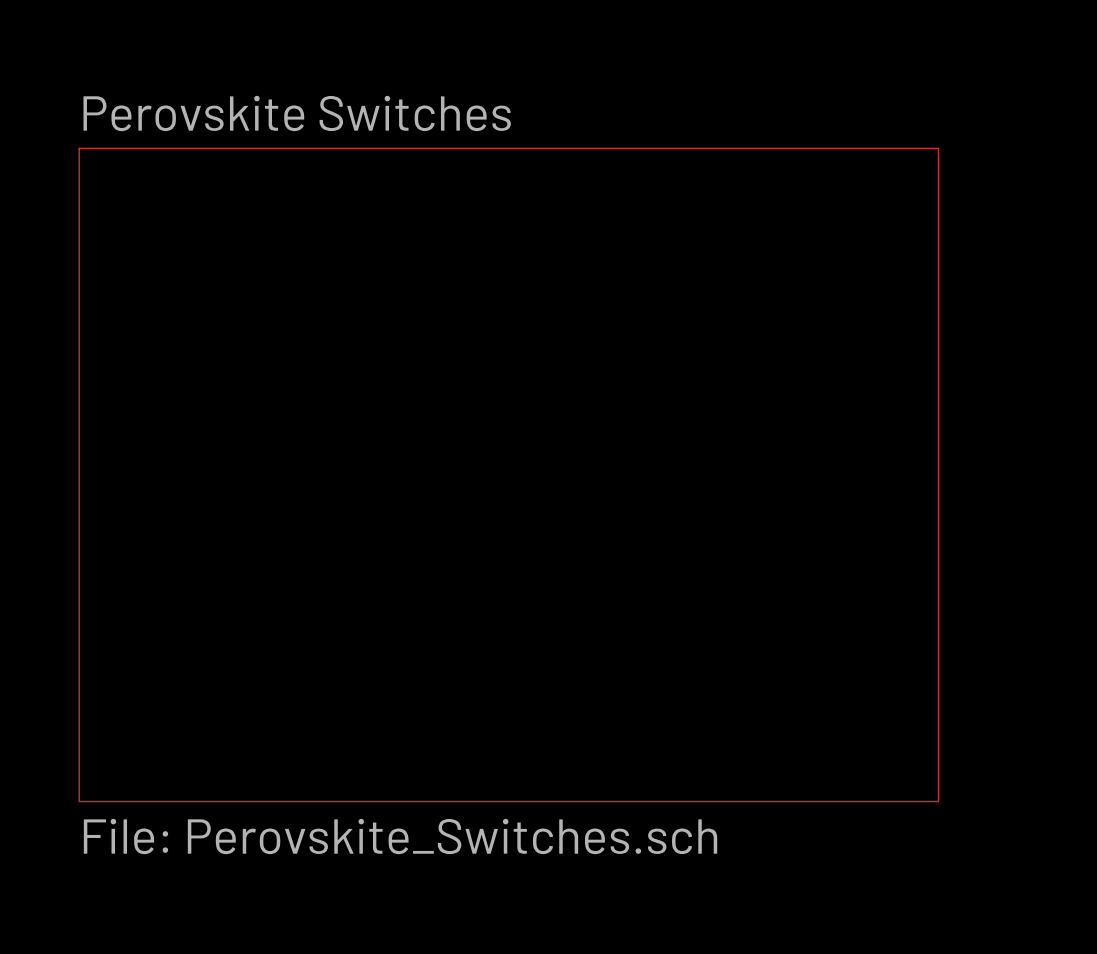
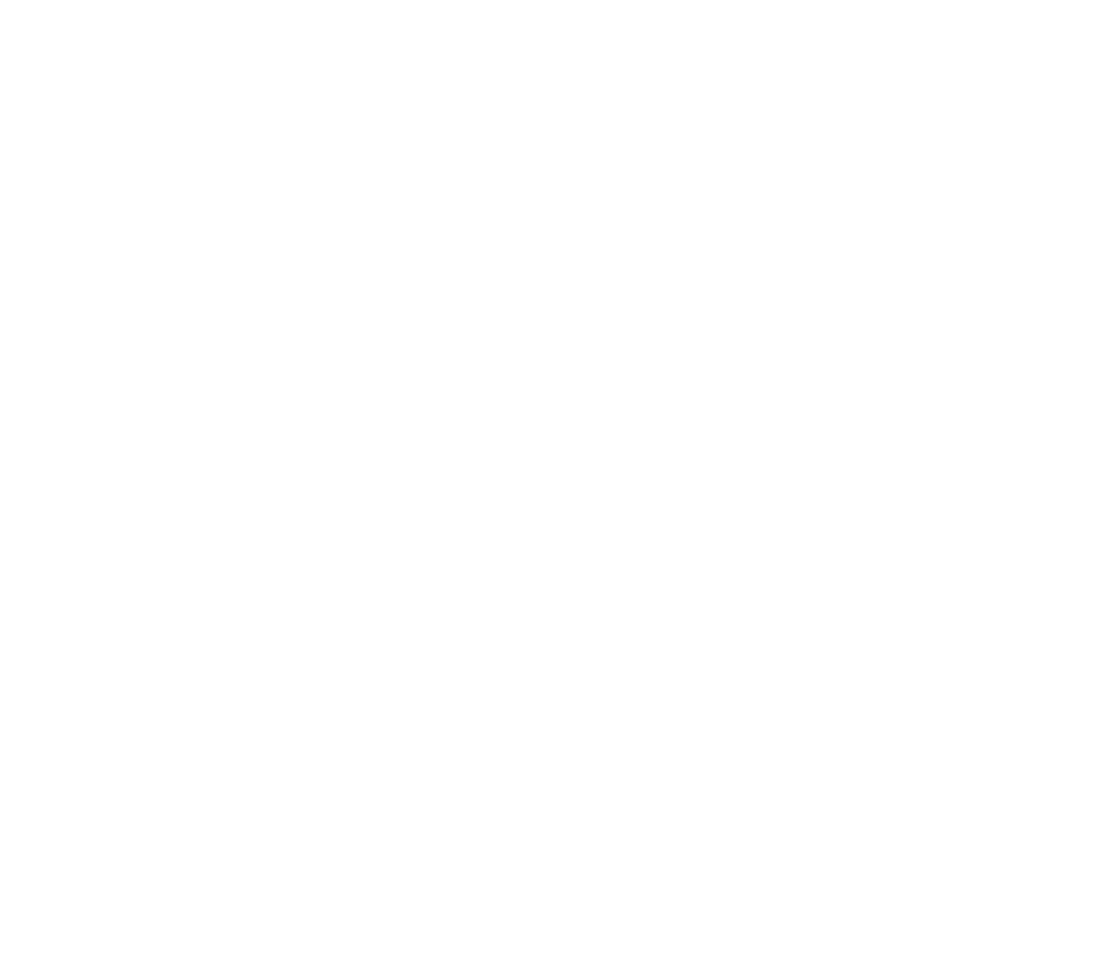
sheet Perovskite Switches: File: Perovskite_Switches.sch (508, 474) -> none

